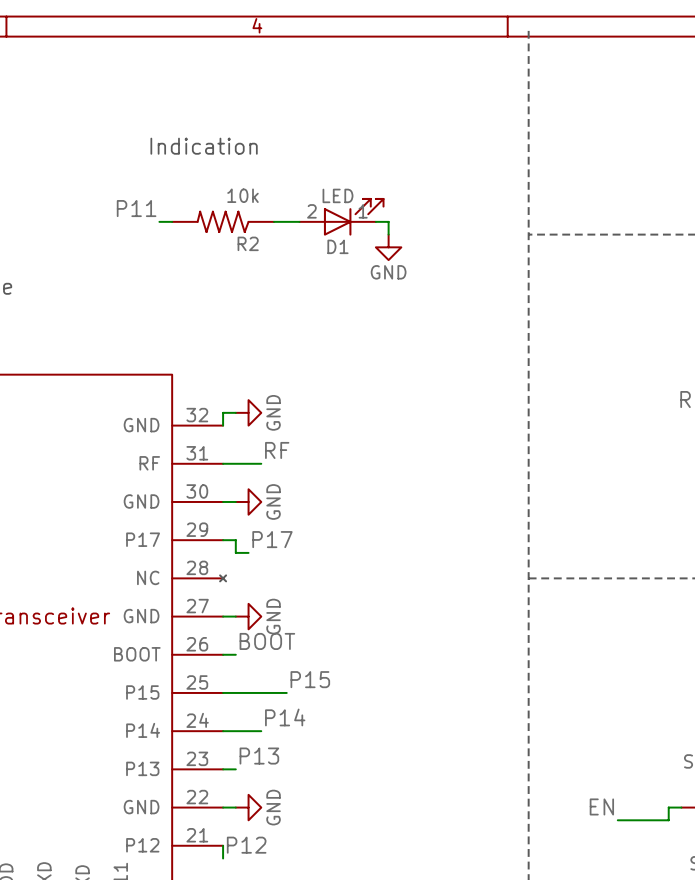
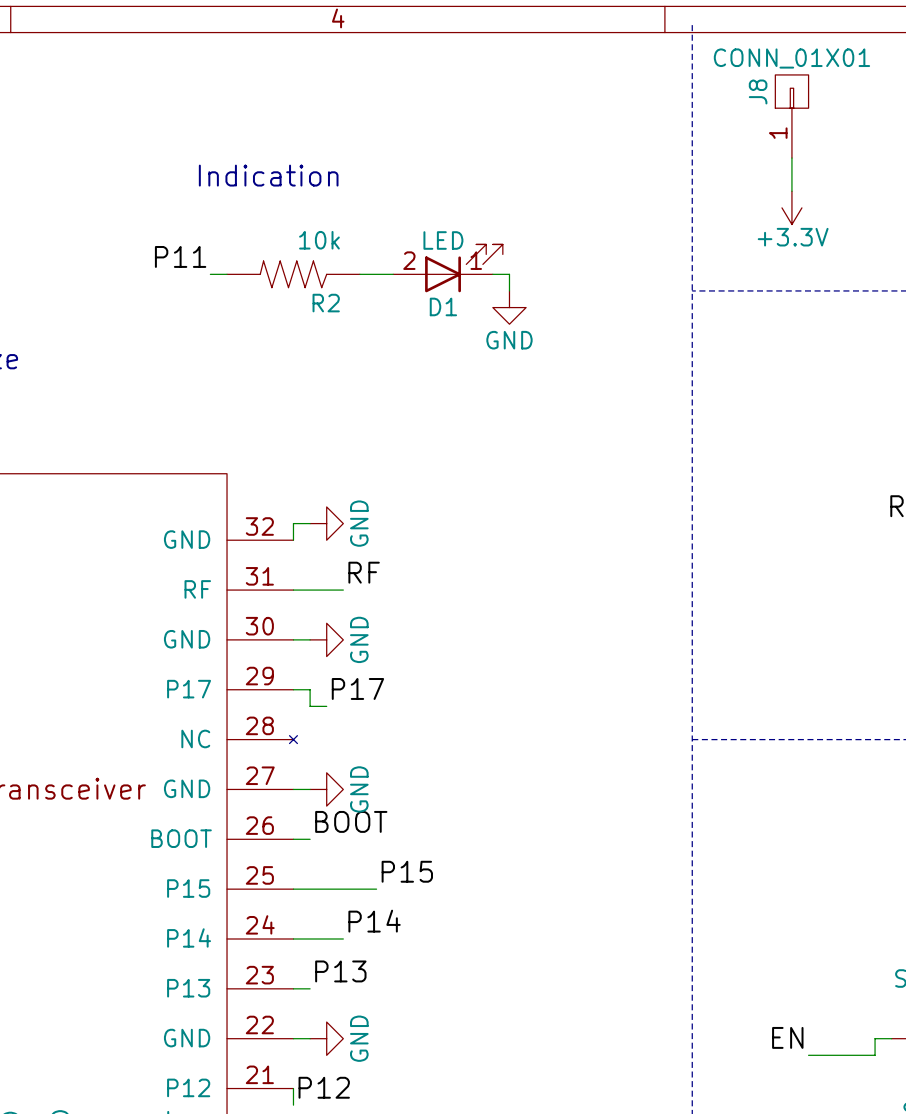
J8: none -> CONN_01X01 (791, 116)
wire: none -> (791, 158) (791, 191)
power symbol: none -> +3.3V (791, 207)

